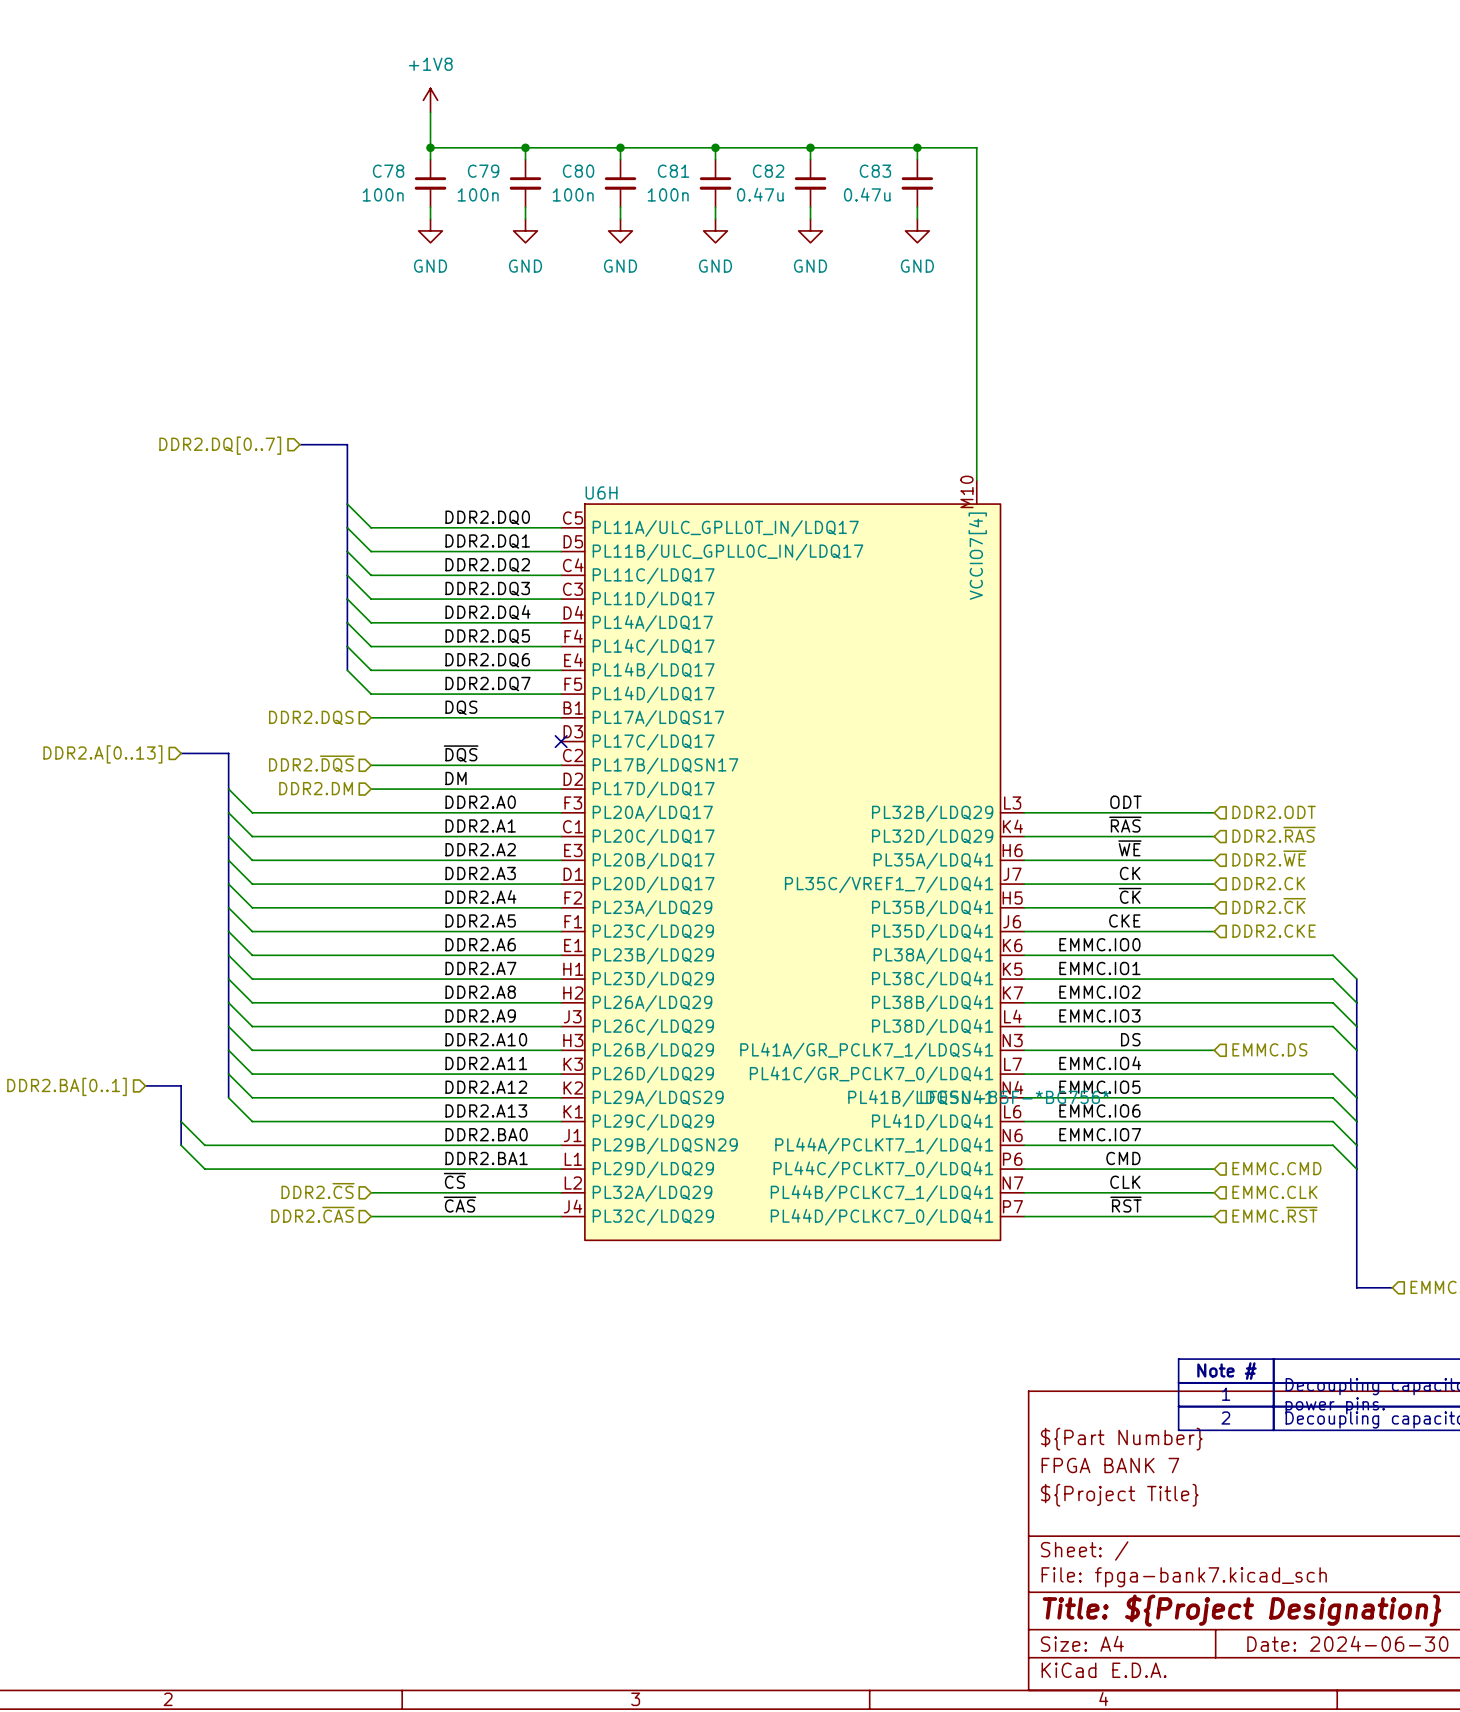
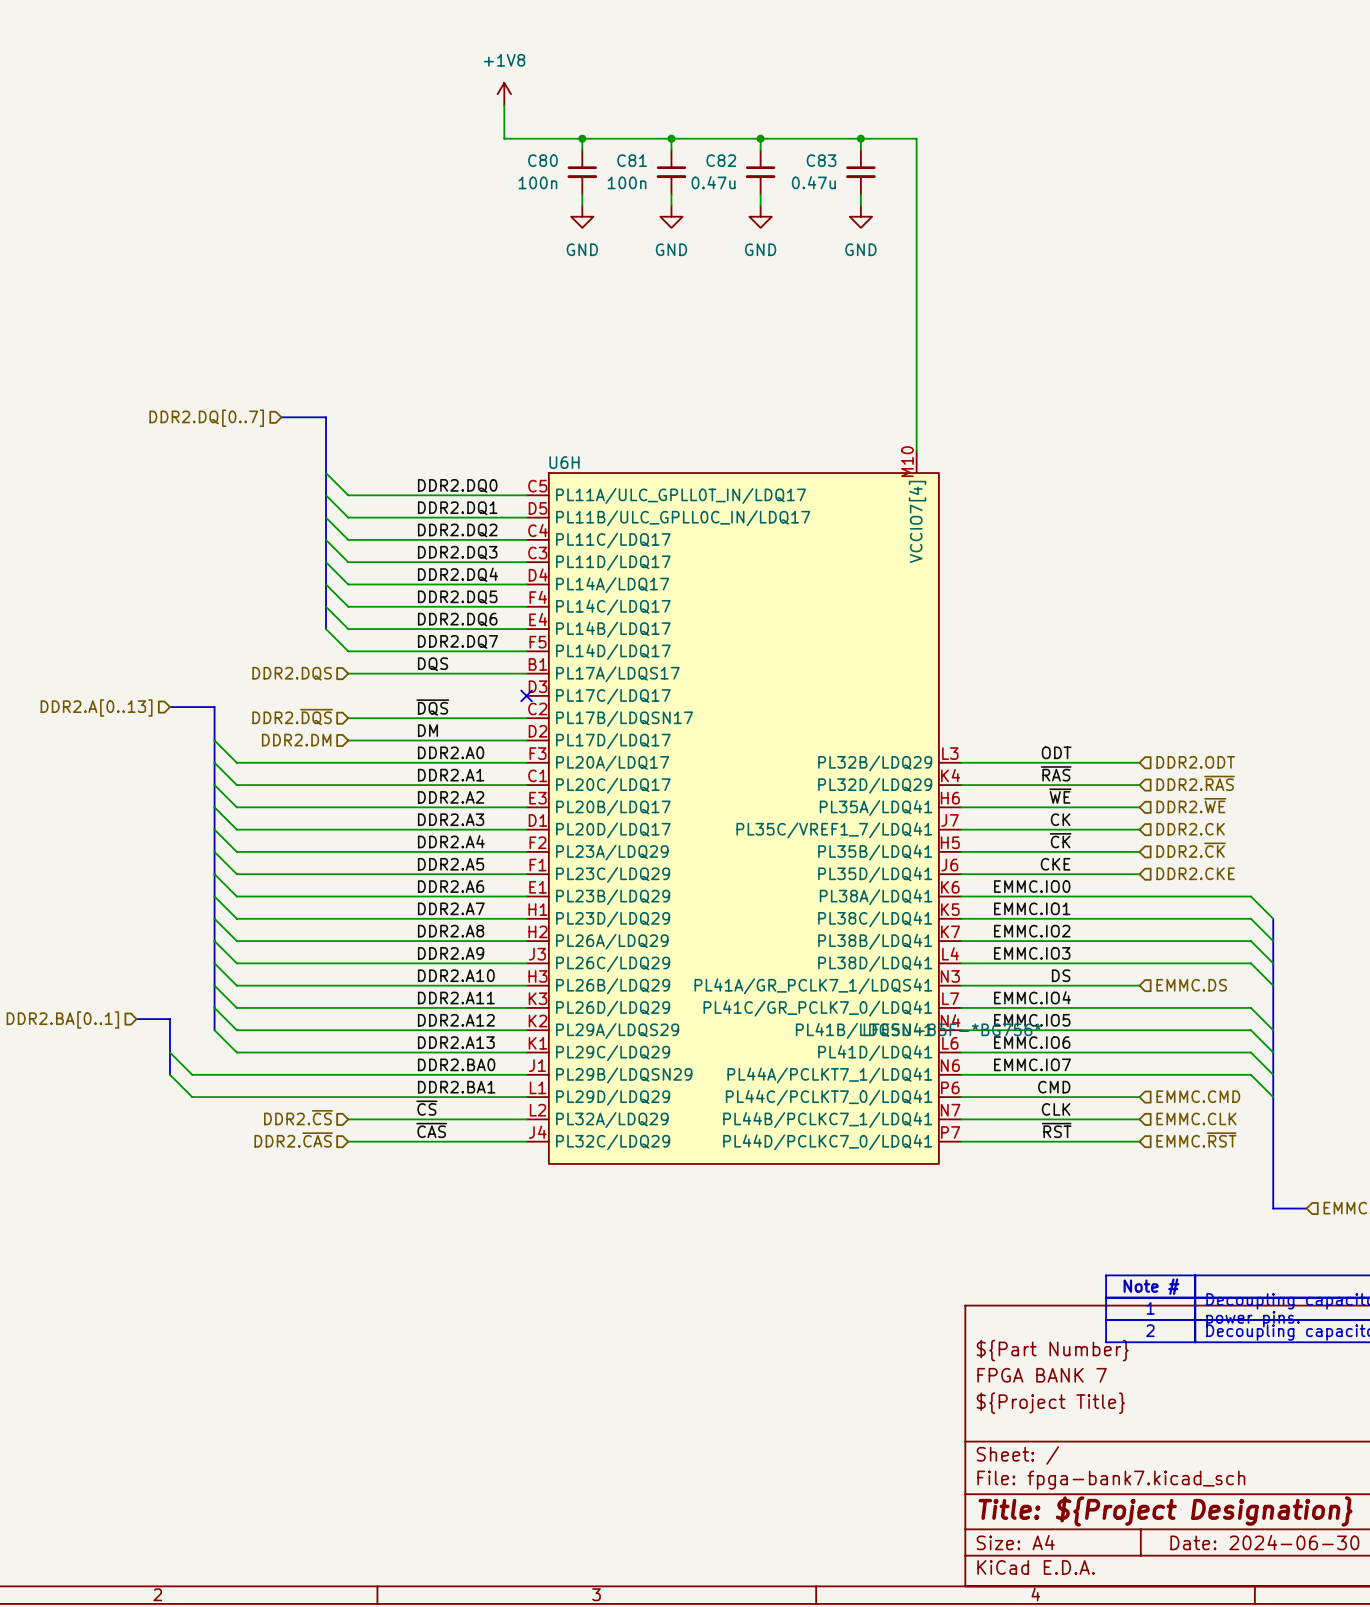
power symbol position: +1V8 (430, 100) -> +1V8 (504, 94)
wire: (430, 112) (430, 159) -> none
wire: (430, 147) (537, 147) -> (504, 105) (504, 138)
junction: (430, 147) -> none
wire: (525, 147) (525, 159) -> none
junction: (525, 147) -> none
C78: 100n (430, 183) -> none
C79: 100n (525, 183) -> none
wire: (430, 207) (430, 219) -> none
wire: (525, 207) (525, 219) -> none
power symbol: GND (430, 230) -> none
power symbol: GND (525, 230) -> none

